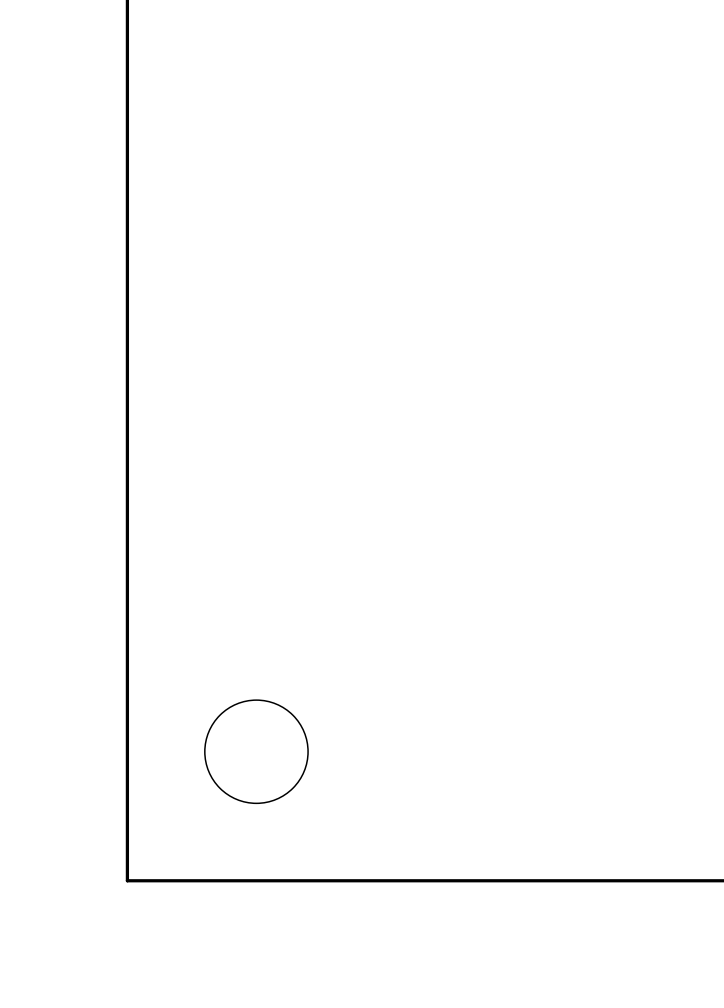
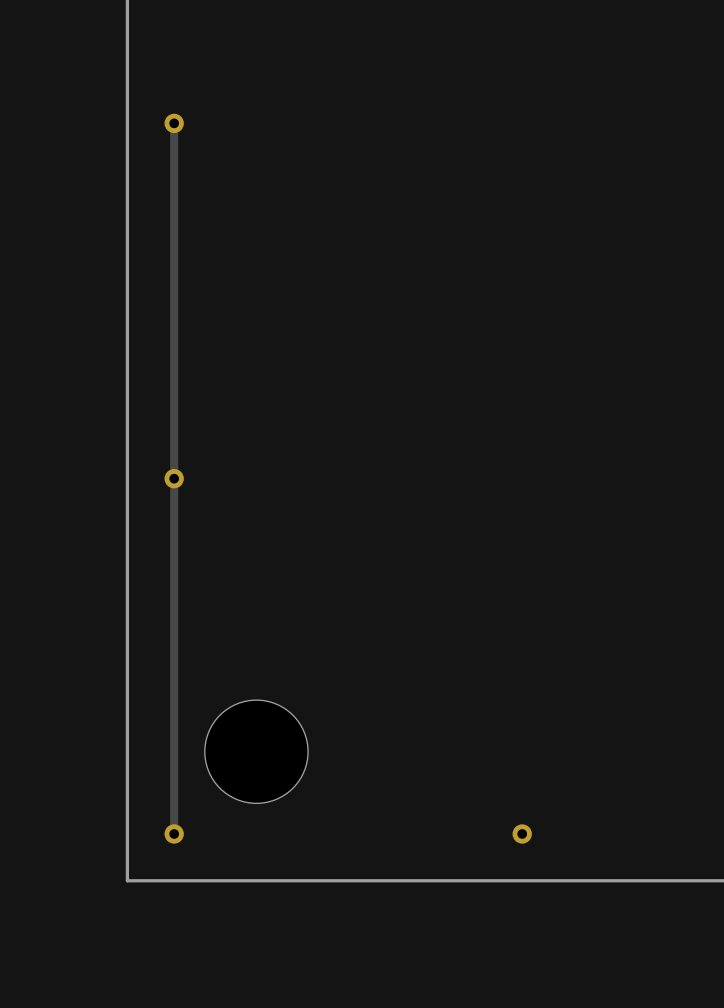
track: none -> (174, 123) (174, 833)
via: none -> (174, 123)
via: none -> (174, 478)
via: none -> (174, 833)
via: none -> (522, 833)

